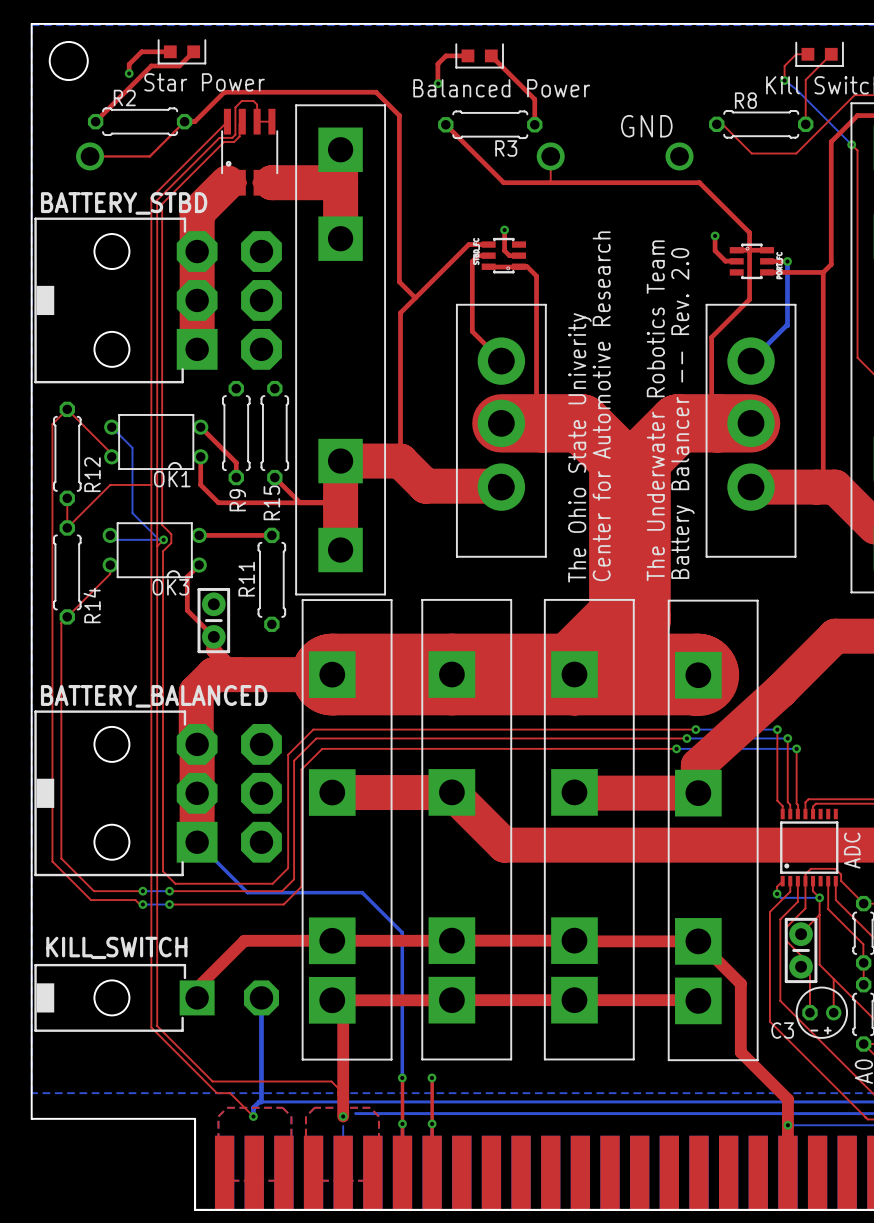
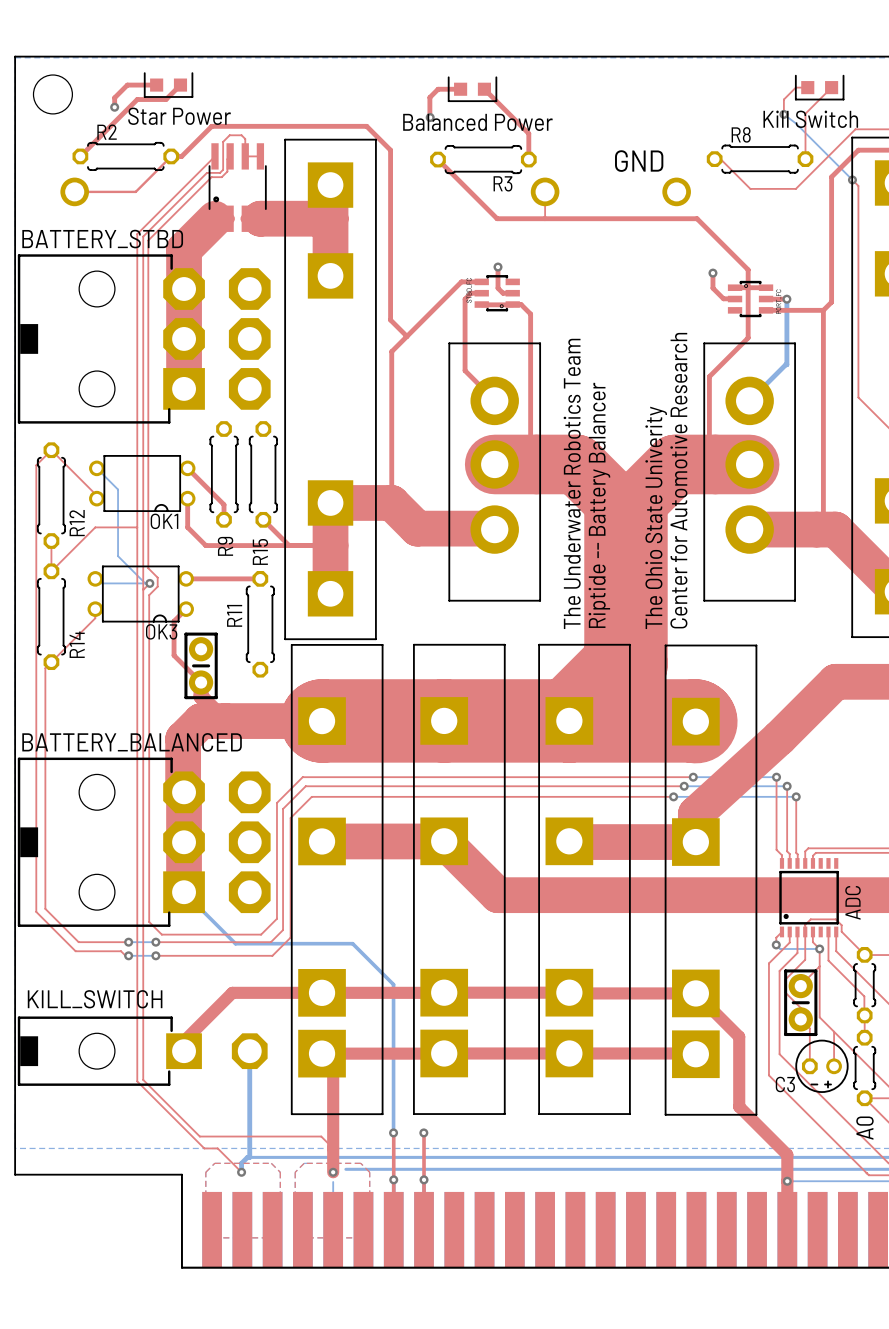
text: Center for Automotive Research (601, 406) -> Riptide -- Battery Balancer (599, 505)
text: The Underwater Robotics Team (655, 410) -> The Ohio State Univerity (656, 517)
text: Battery Balancer -- Rev. 2.0 (682, 413) -> Center for Automotive Research (678, 480)
text: The Ohio State Univerity (579, 447) -> The Underwater Robotics Team (572, 483)

